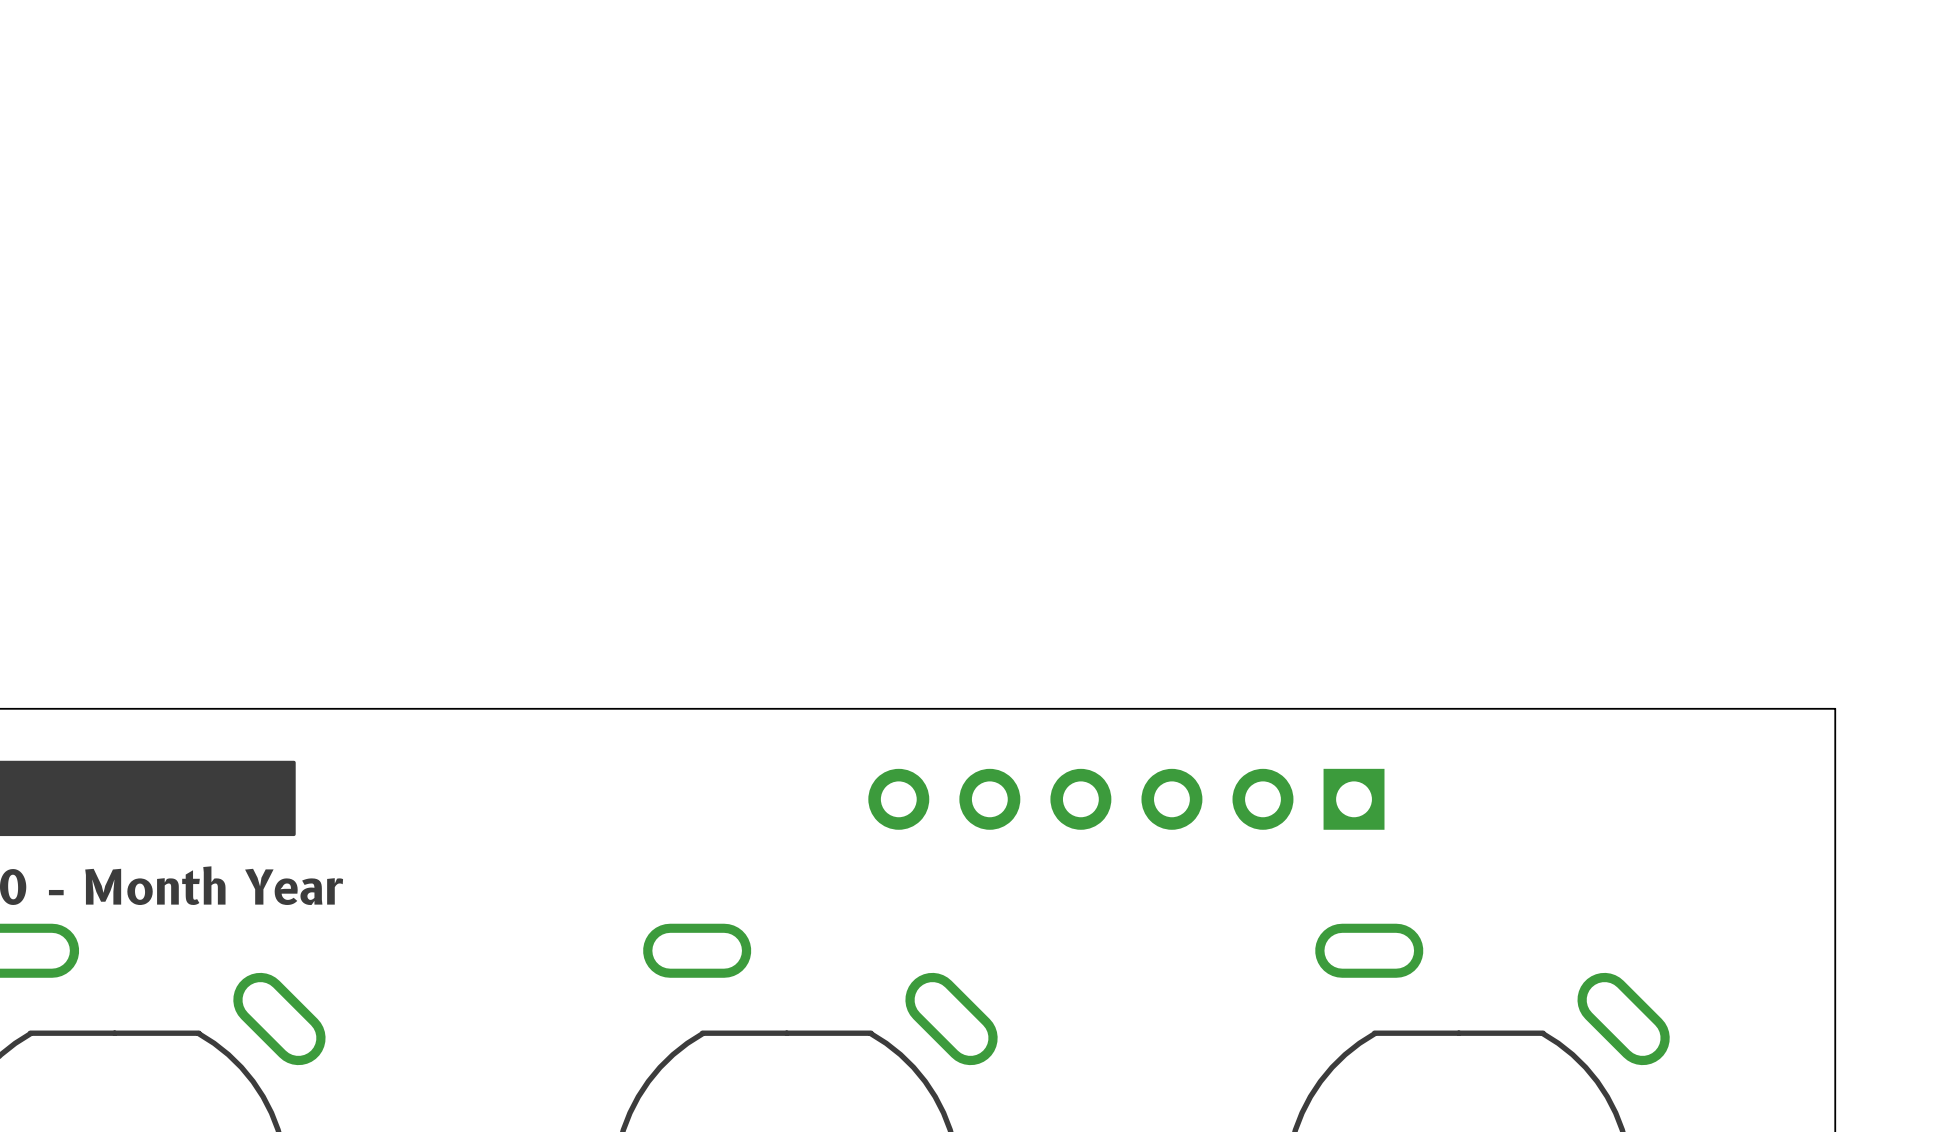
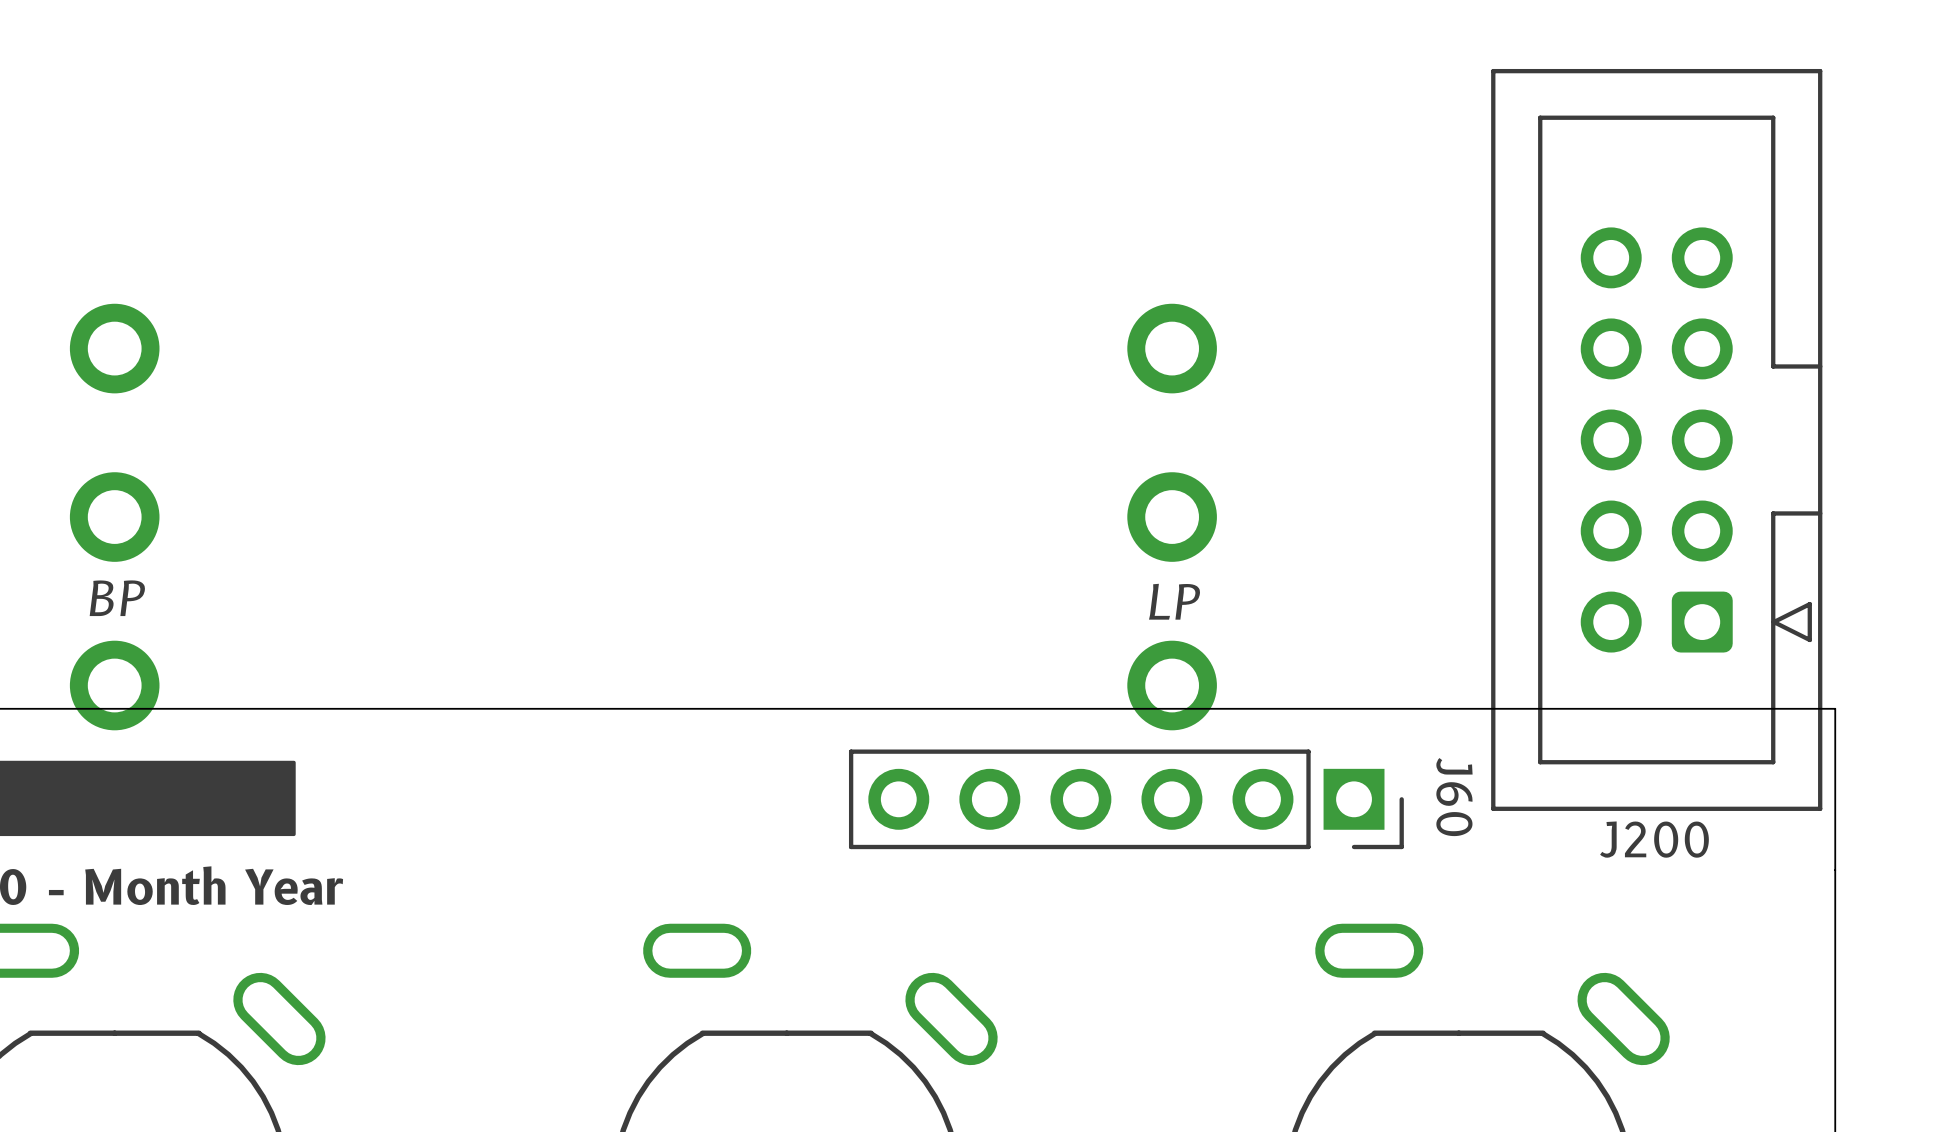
J200: none -> (1656, 439)
part: none -> (114, 517)
part: none -> (1172, 517)
J60 side: top (1126, 799) -> bottom (1126, 799)

